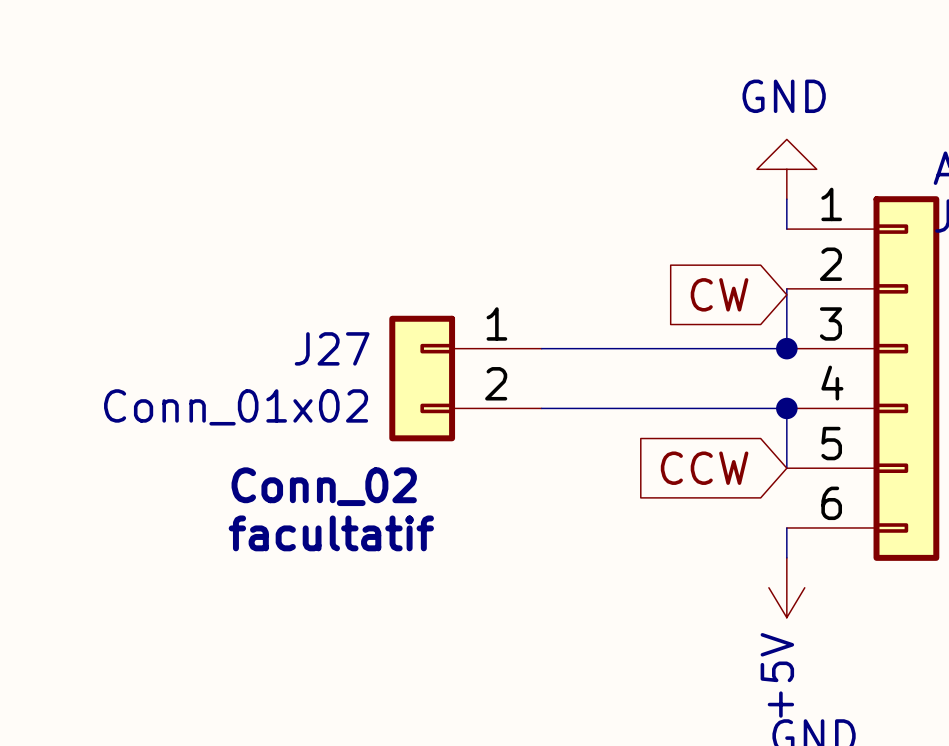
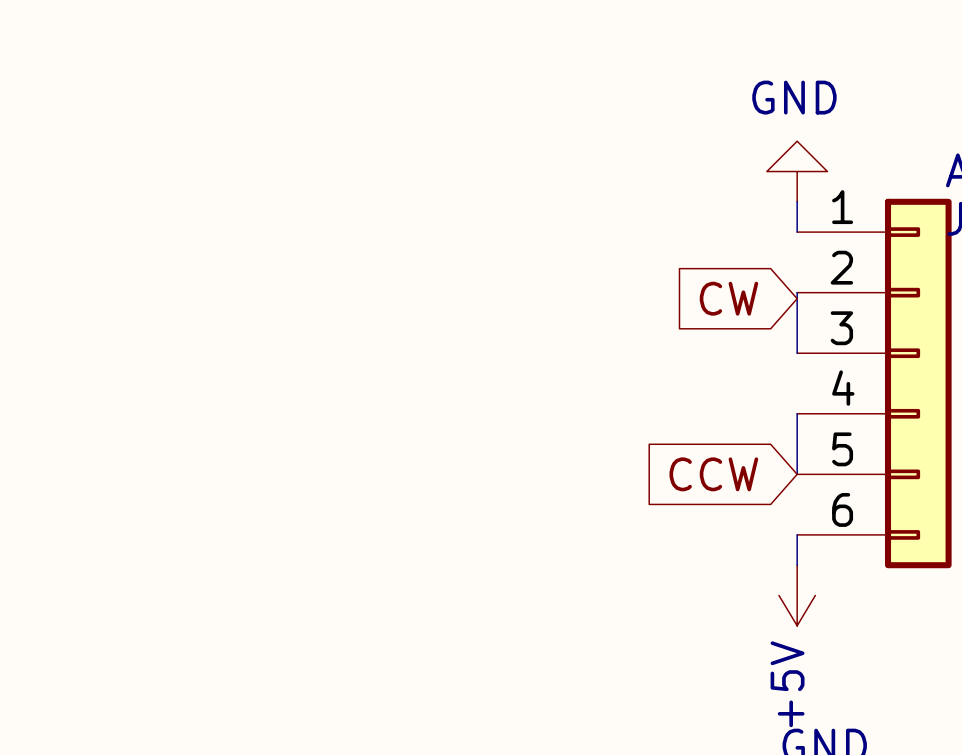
wire: (541, 348) (786, 348) -> none
junction: (786, 348) -> none
J27: Conn_01x02 (465, 378) -> none
wire: (541, 408) (786, 408) -> none
junction: (786, 408) -> none
text: Conn_02 (324, 486) -> none
text: facultatif (331, 533) -> none

